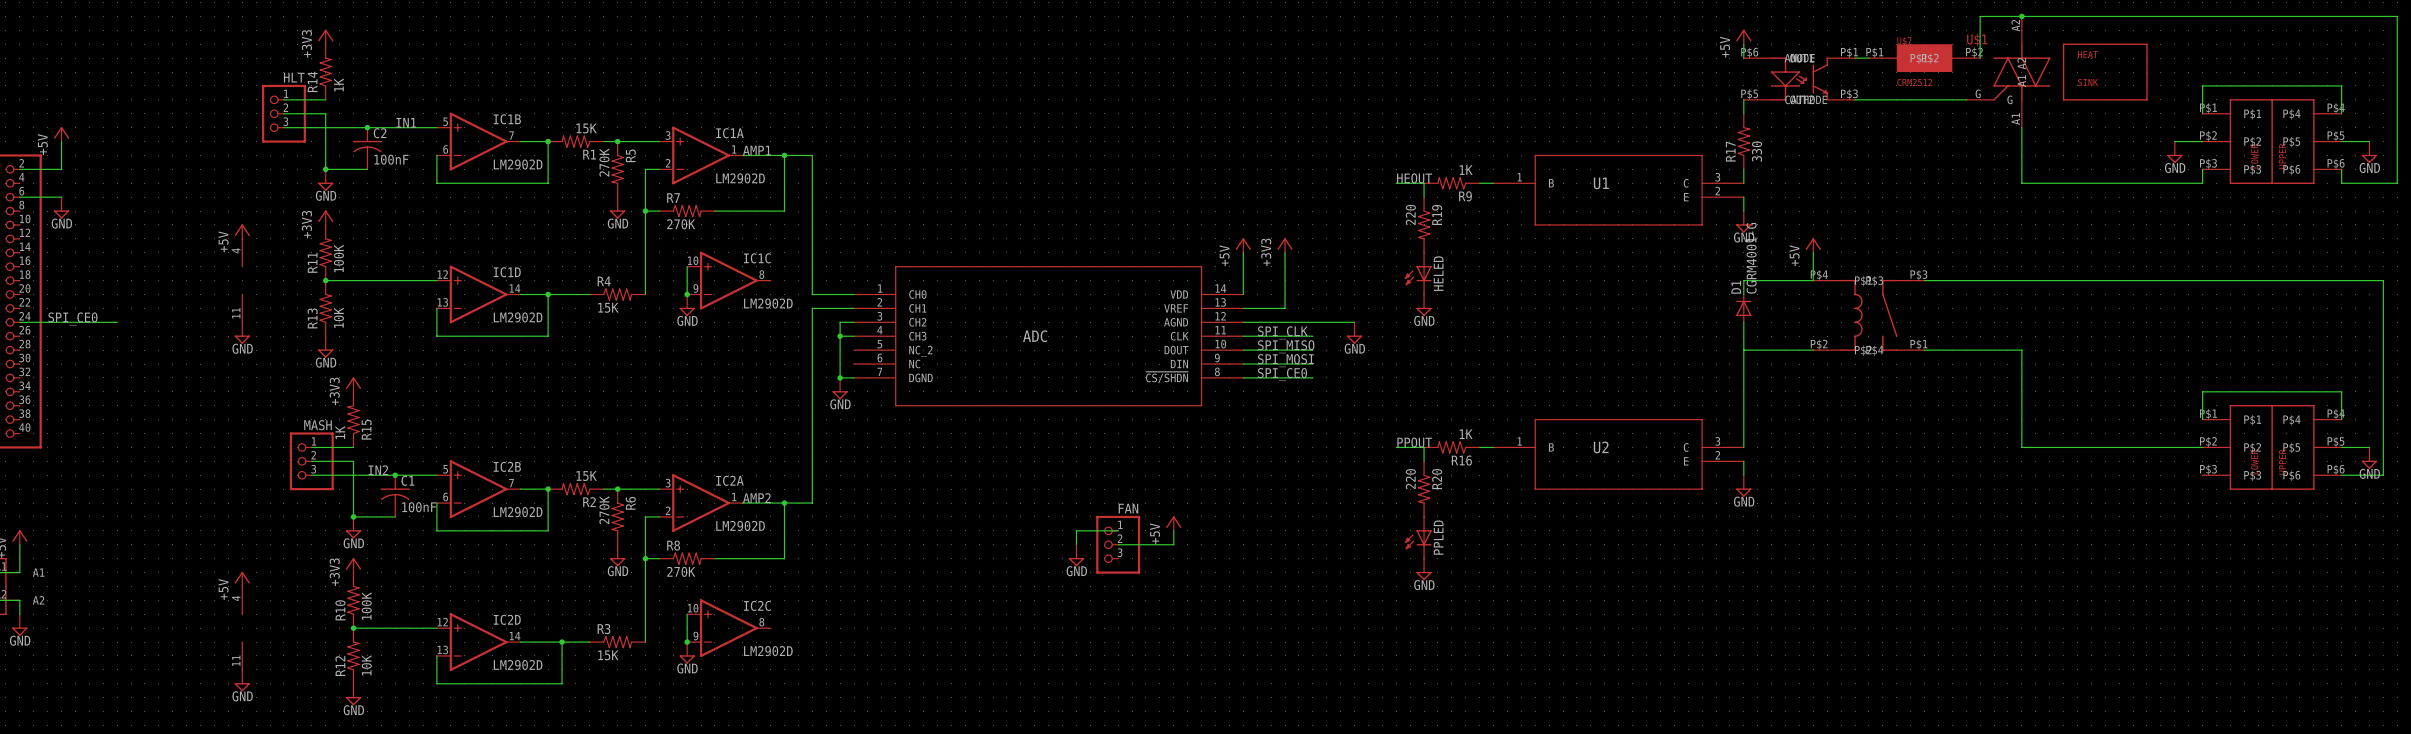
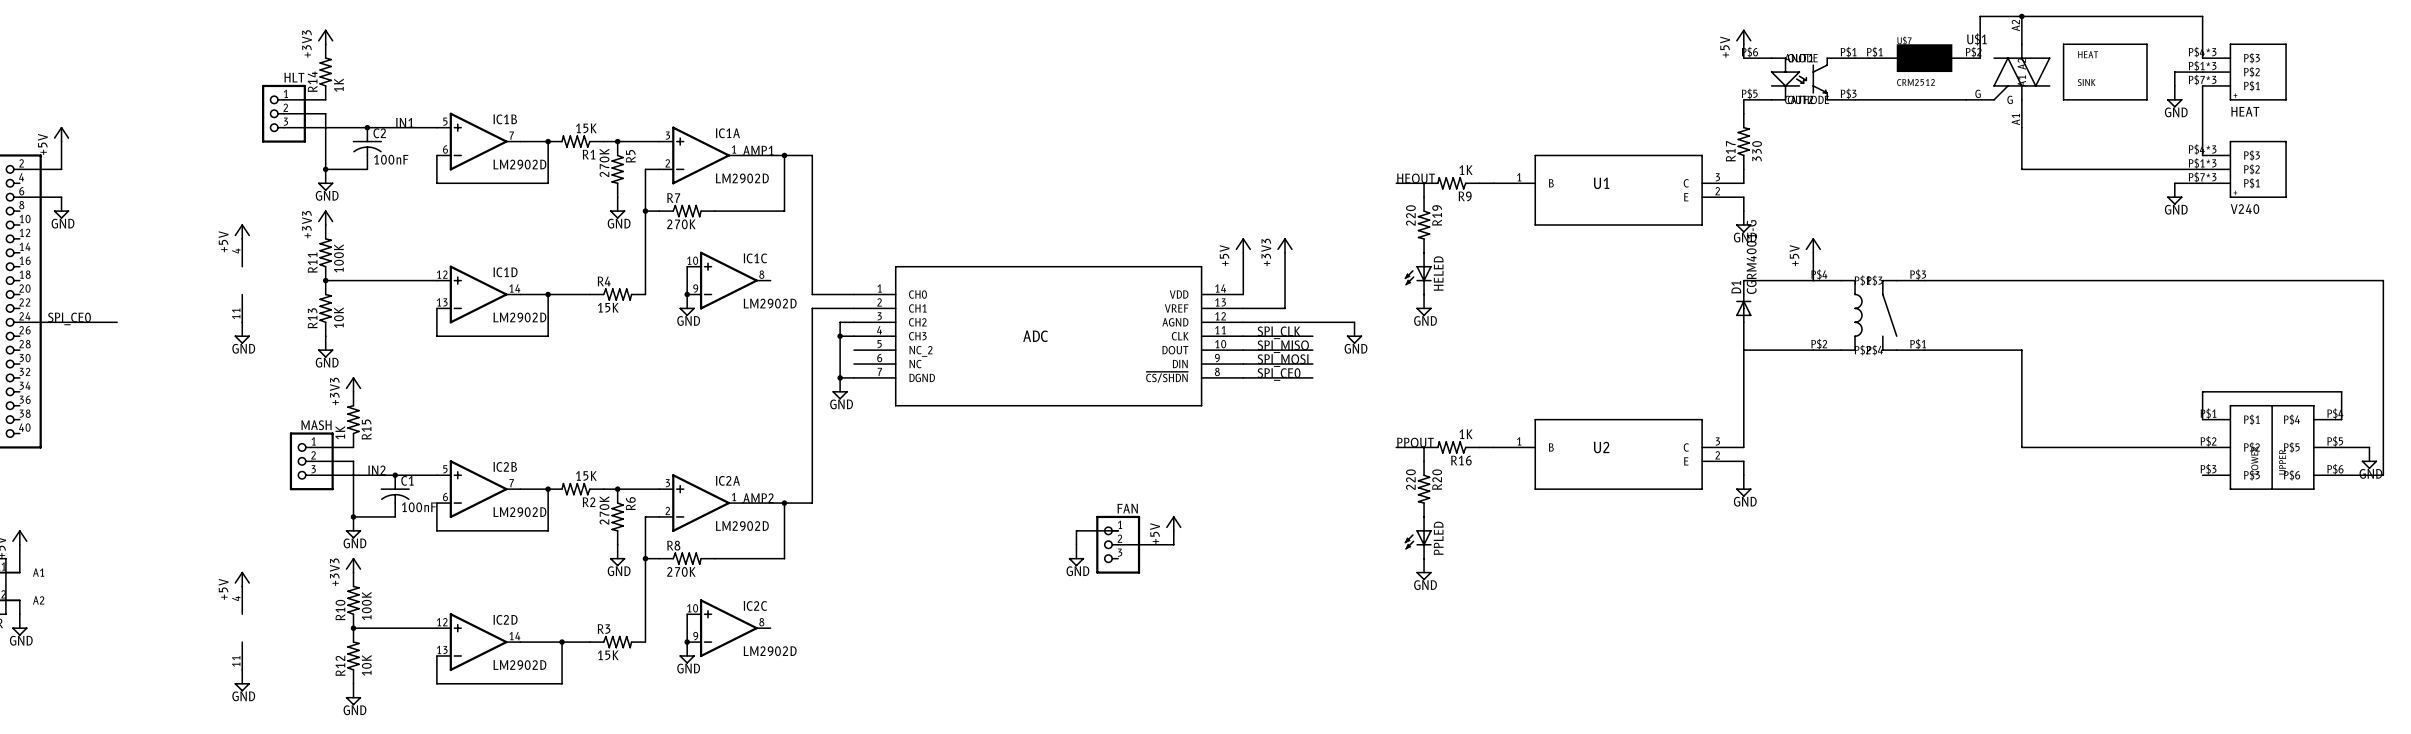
wire: (2202, 16) (2397, 16) (2397, 183) (2341, 183) (2341, 169) -> (2202, 16) (2202, 58)
wire: none -> (2202, 72) (2174, 72) (2174, 85)
HEAT: none -> (2244, 72)
wire: (2202, 85) (2341, 85) (2341, 113) -> none
power symbol: none -> GND (2174, 96)
wire: none -> (2202, 113) (2202, 155)
wire: (2174, 141) (2202, 141) -> none
part: (2272, 141) -> none
wire: (2341, 141) (2369, 141) -> none
power symbol: GND (2174, 152) -> none
power symbol: GND (2369, 152) -> none
wire: (2021, 169) (2021, 183) (2174, 183) -> (2021, 169) (2202, 169)
wire: (2202, 169) (2202, 183) -> none
V240: none -> (2244, 169)
power symbol: none -> GND (2174, 194)

